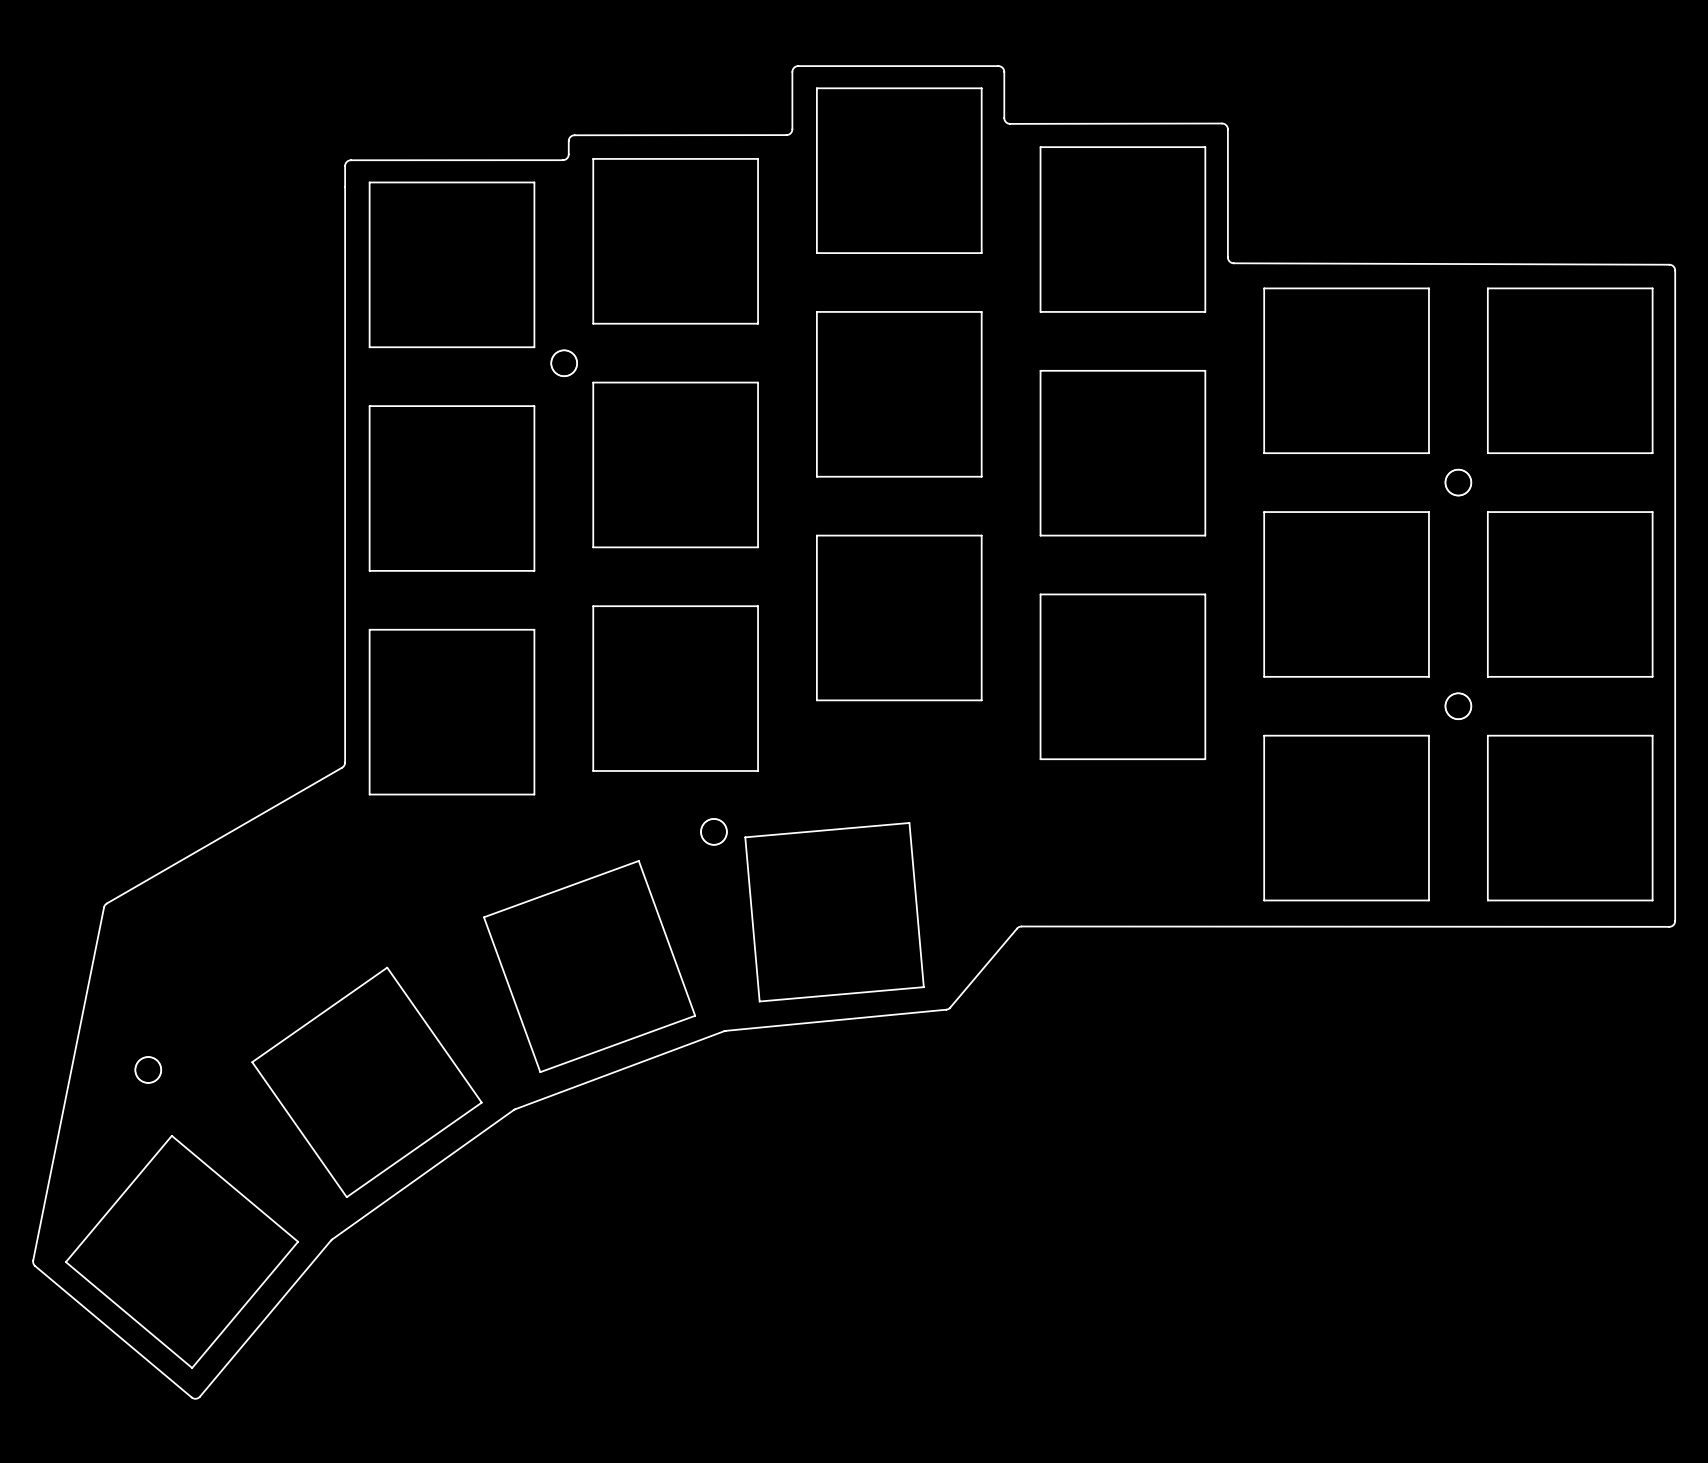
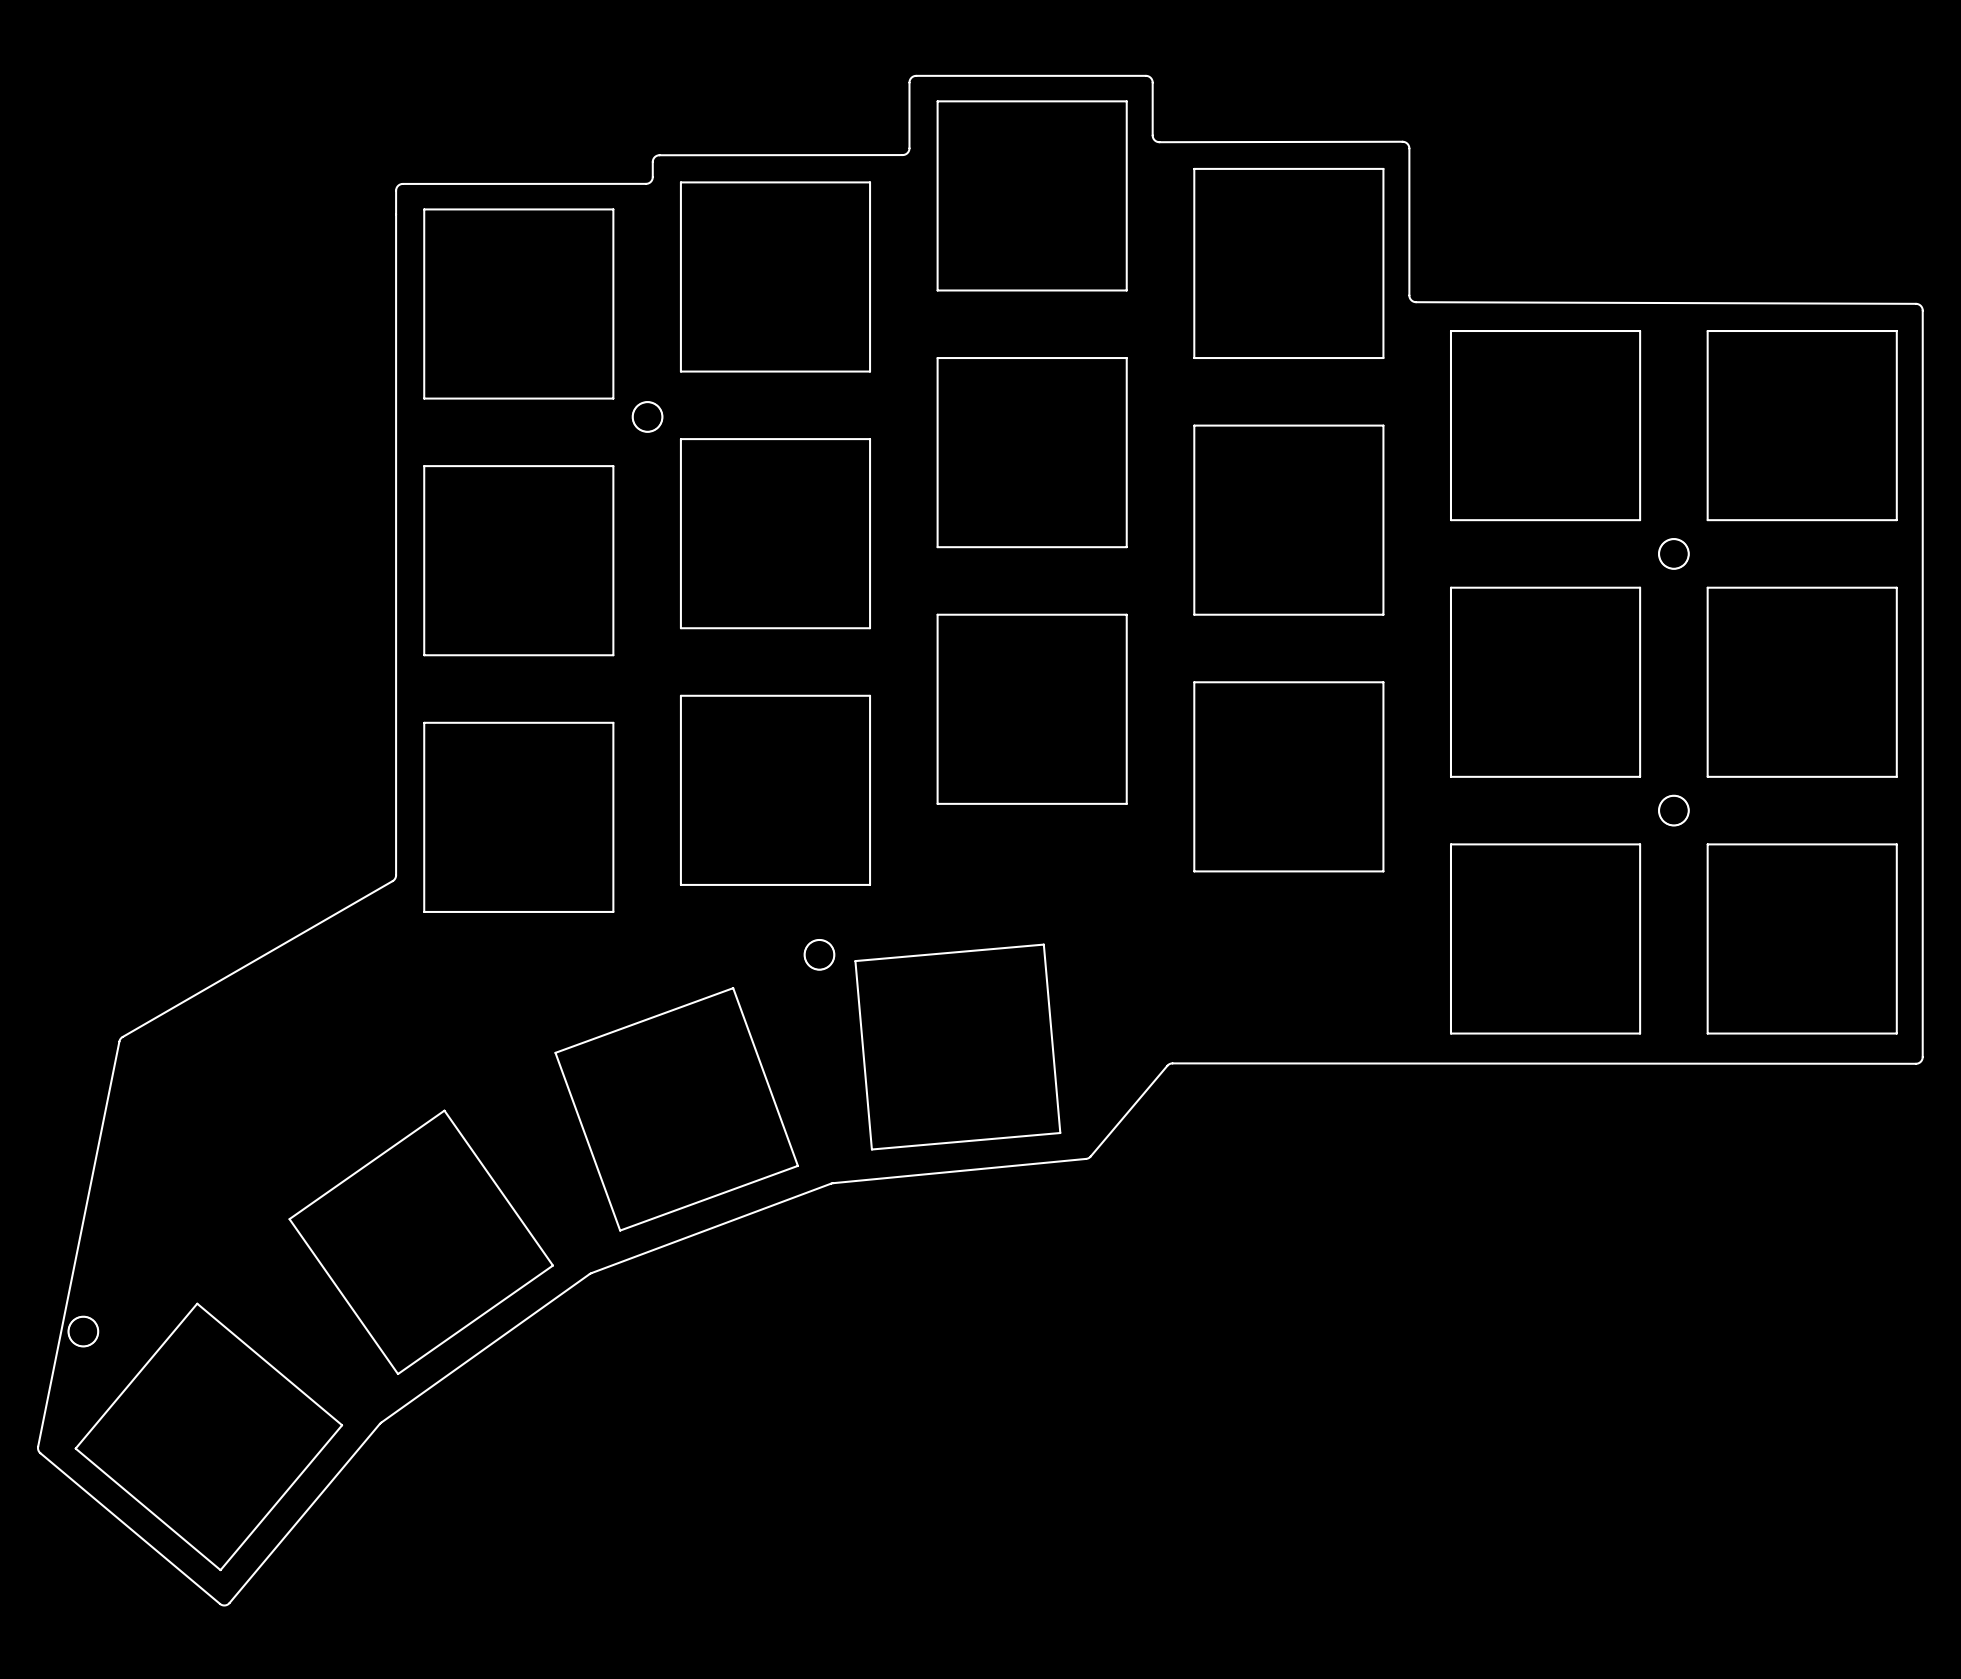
round board edge position: (148, 1069) -> (83, 1331)

